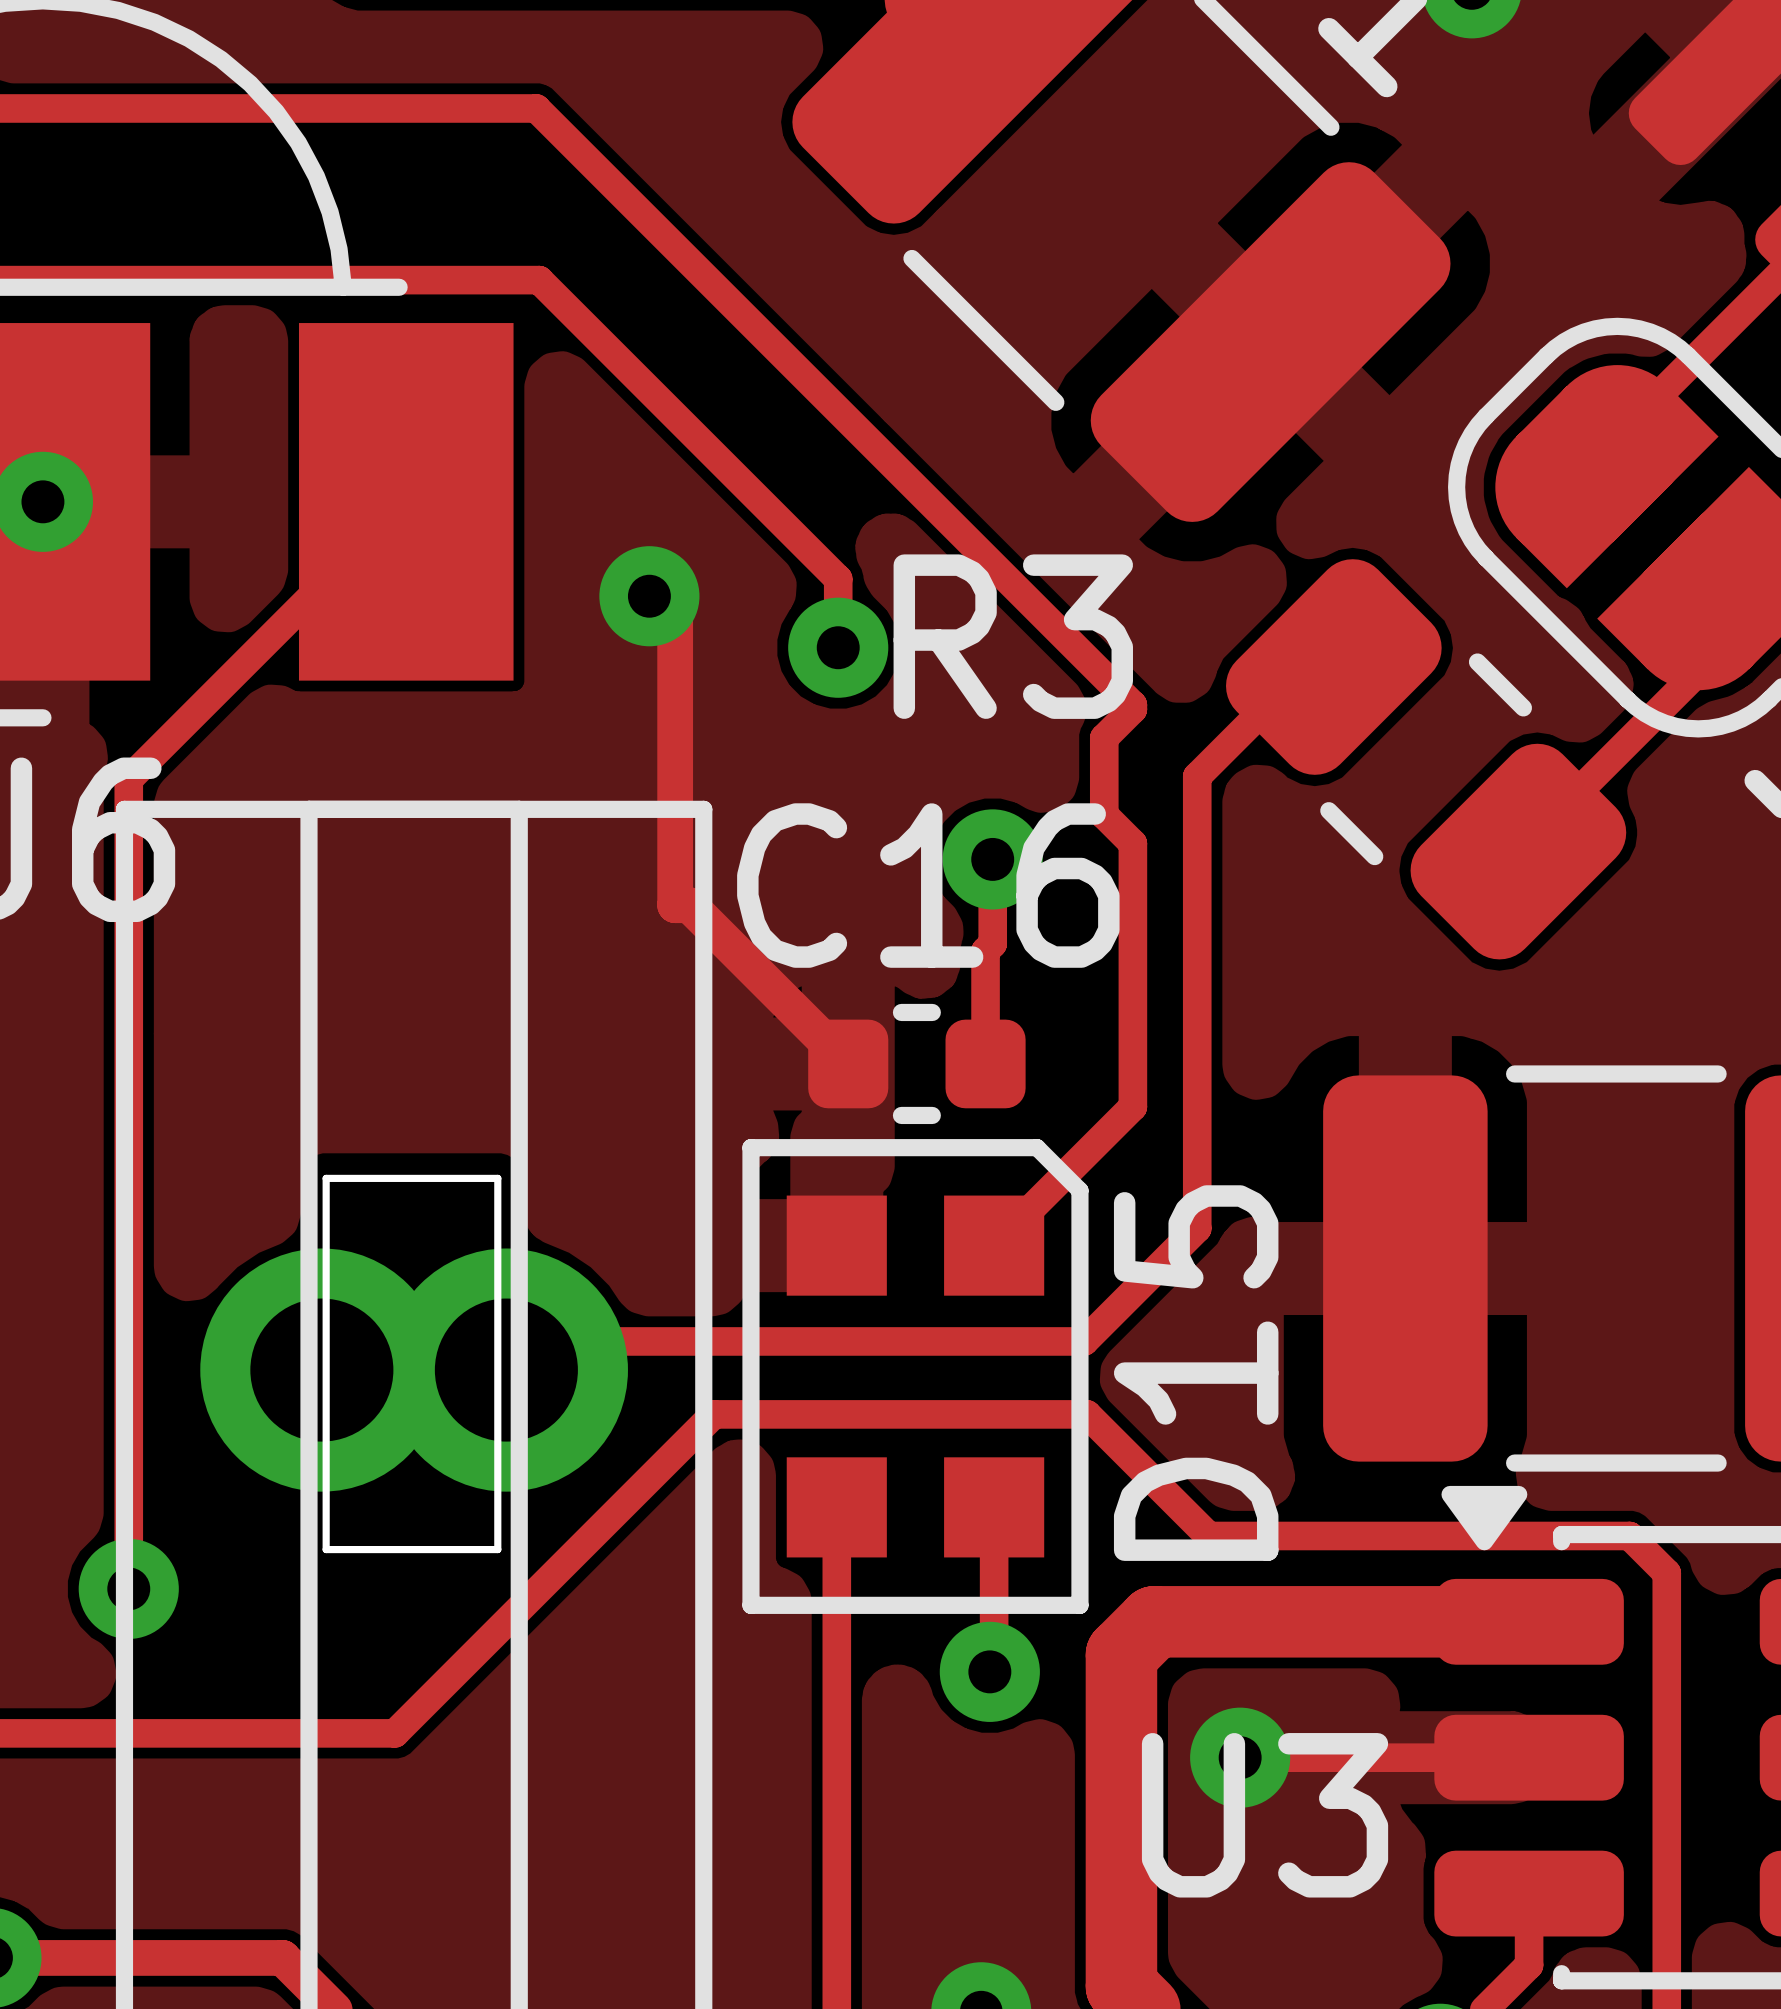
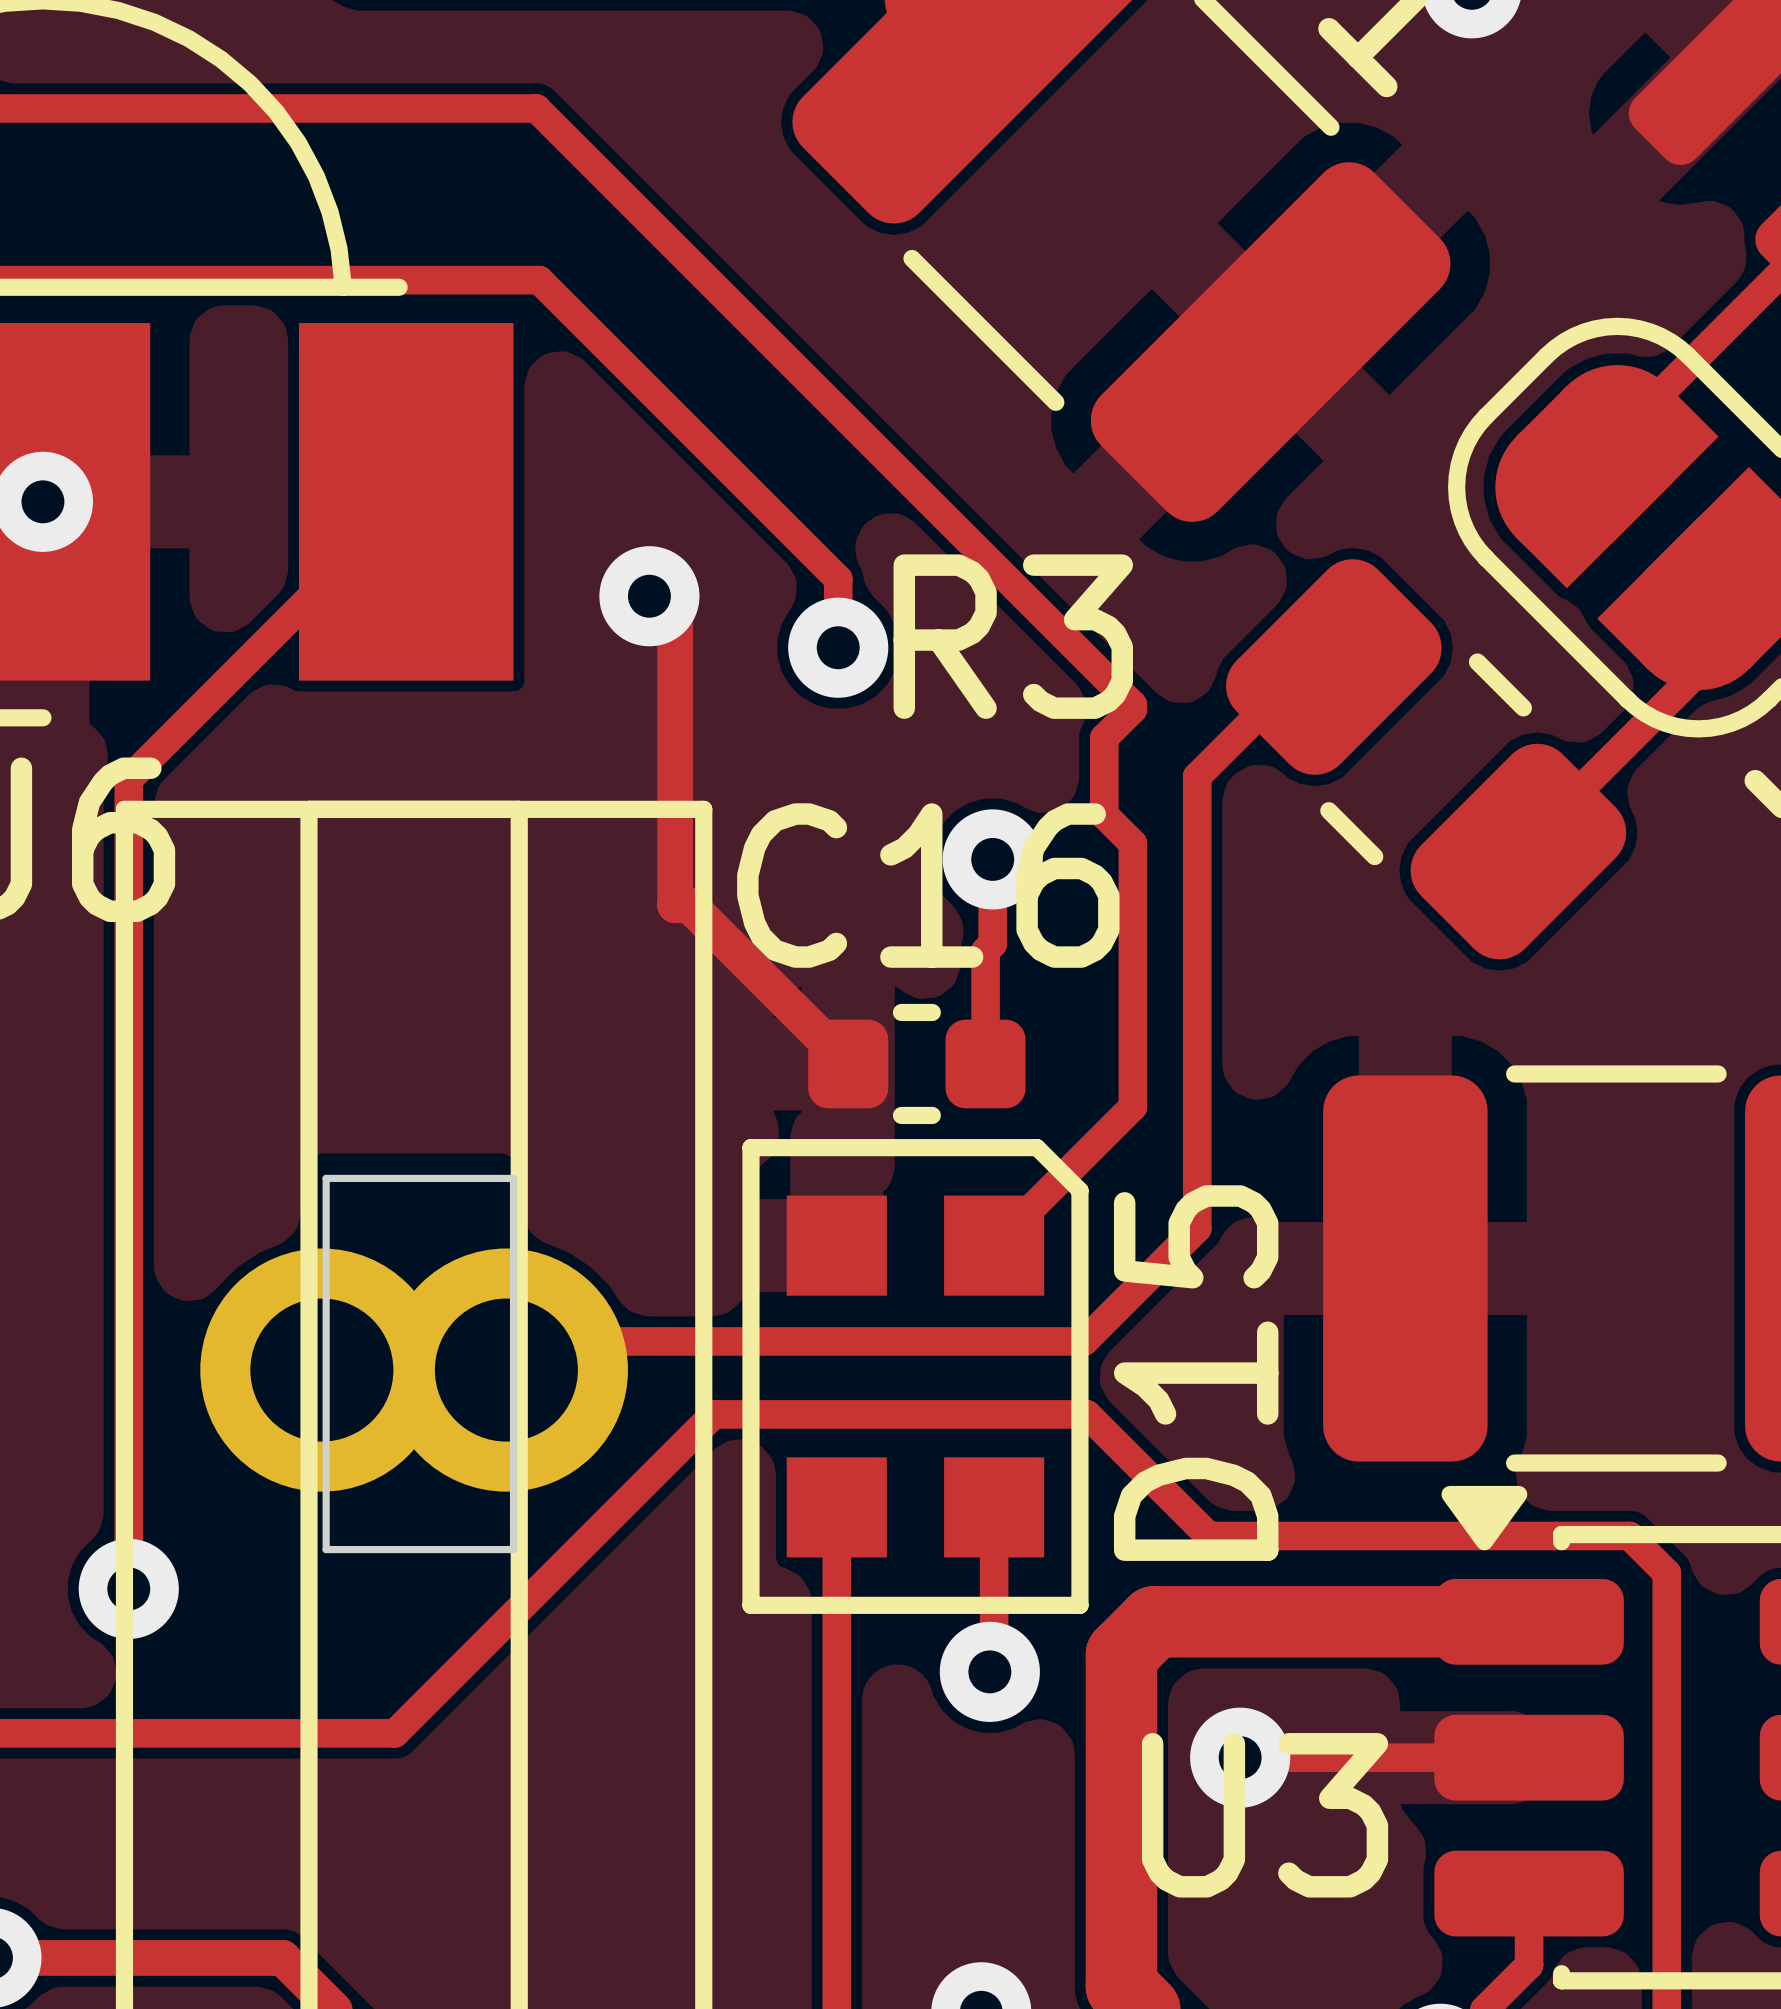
board edge: (497, 1178) (497, 1549) -> (497, 1178) (513, 1178) (513, 1549) (497, 1549)

